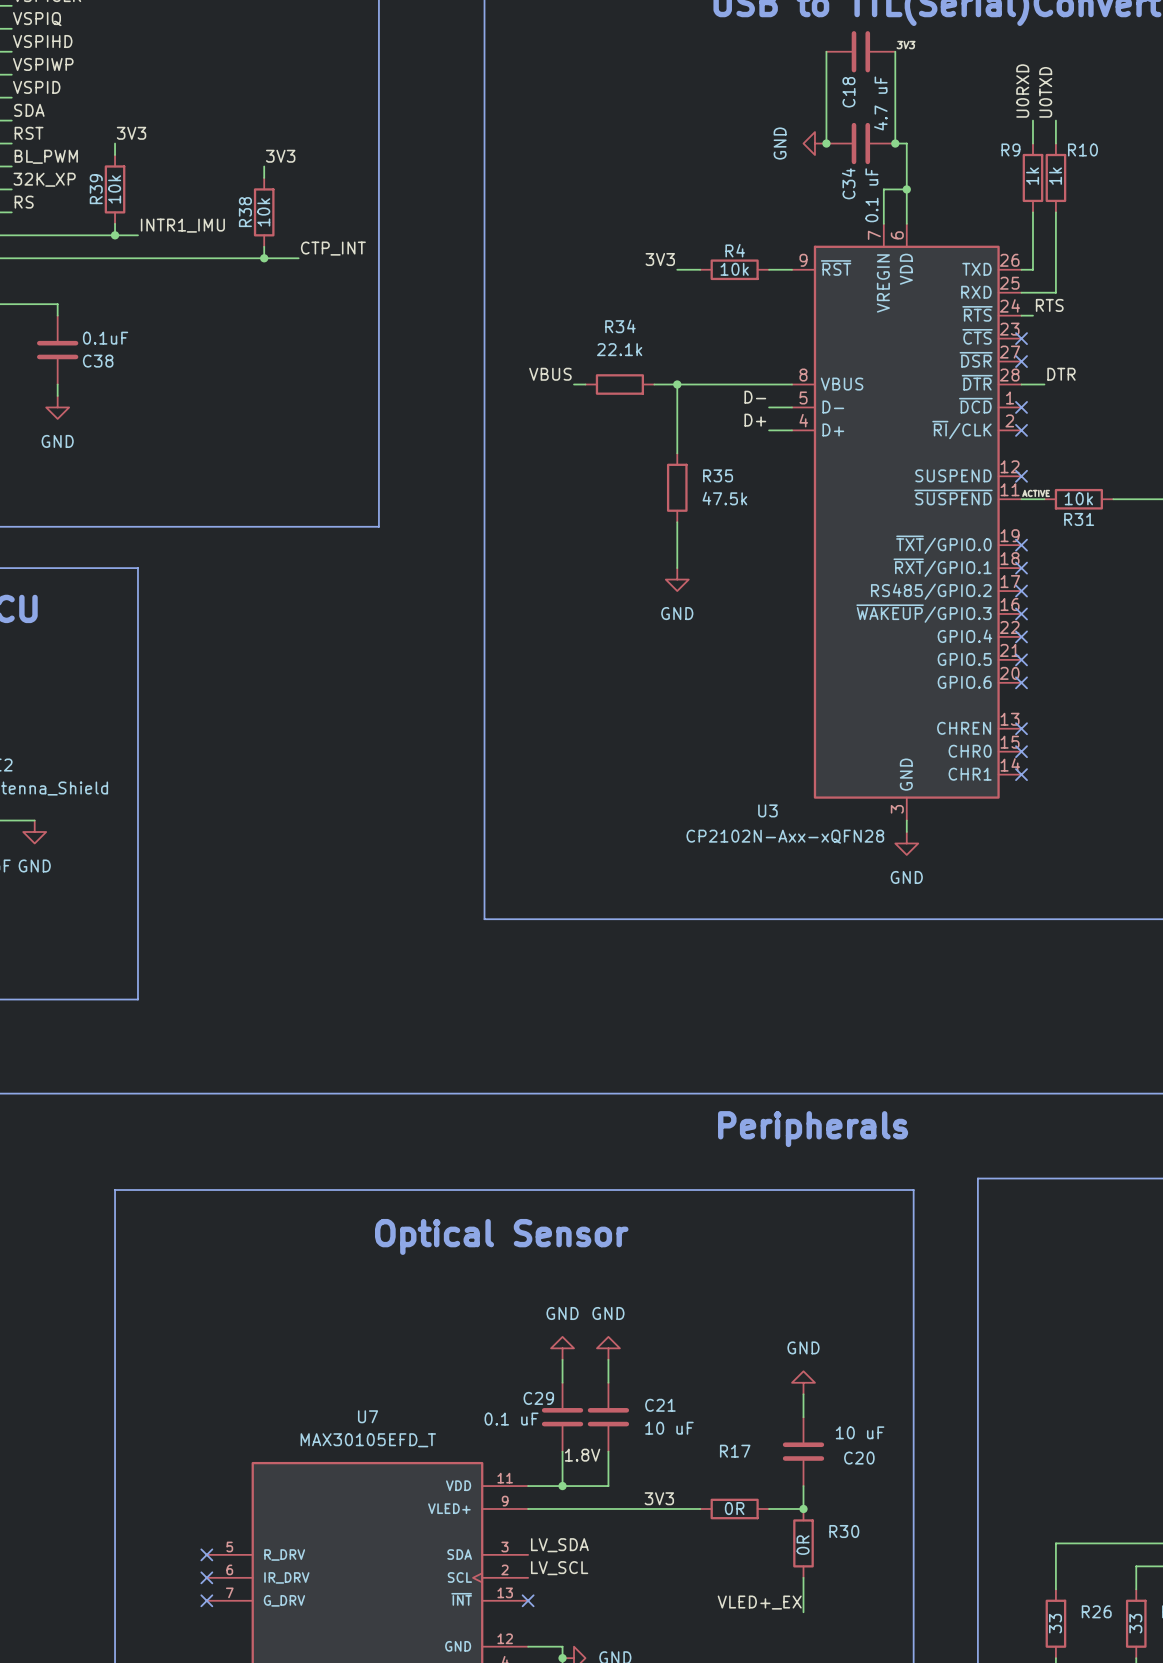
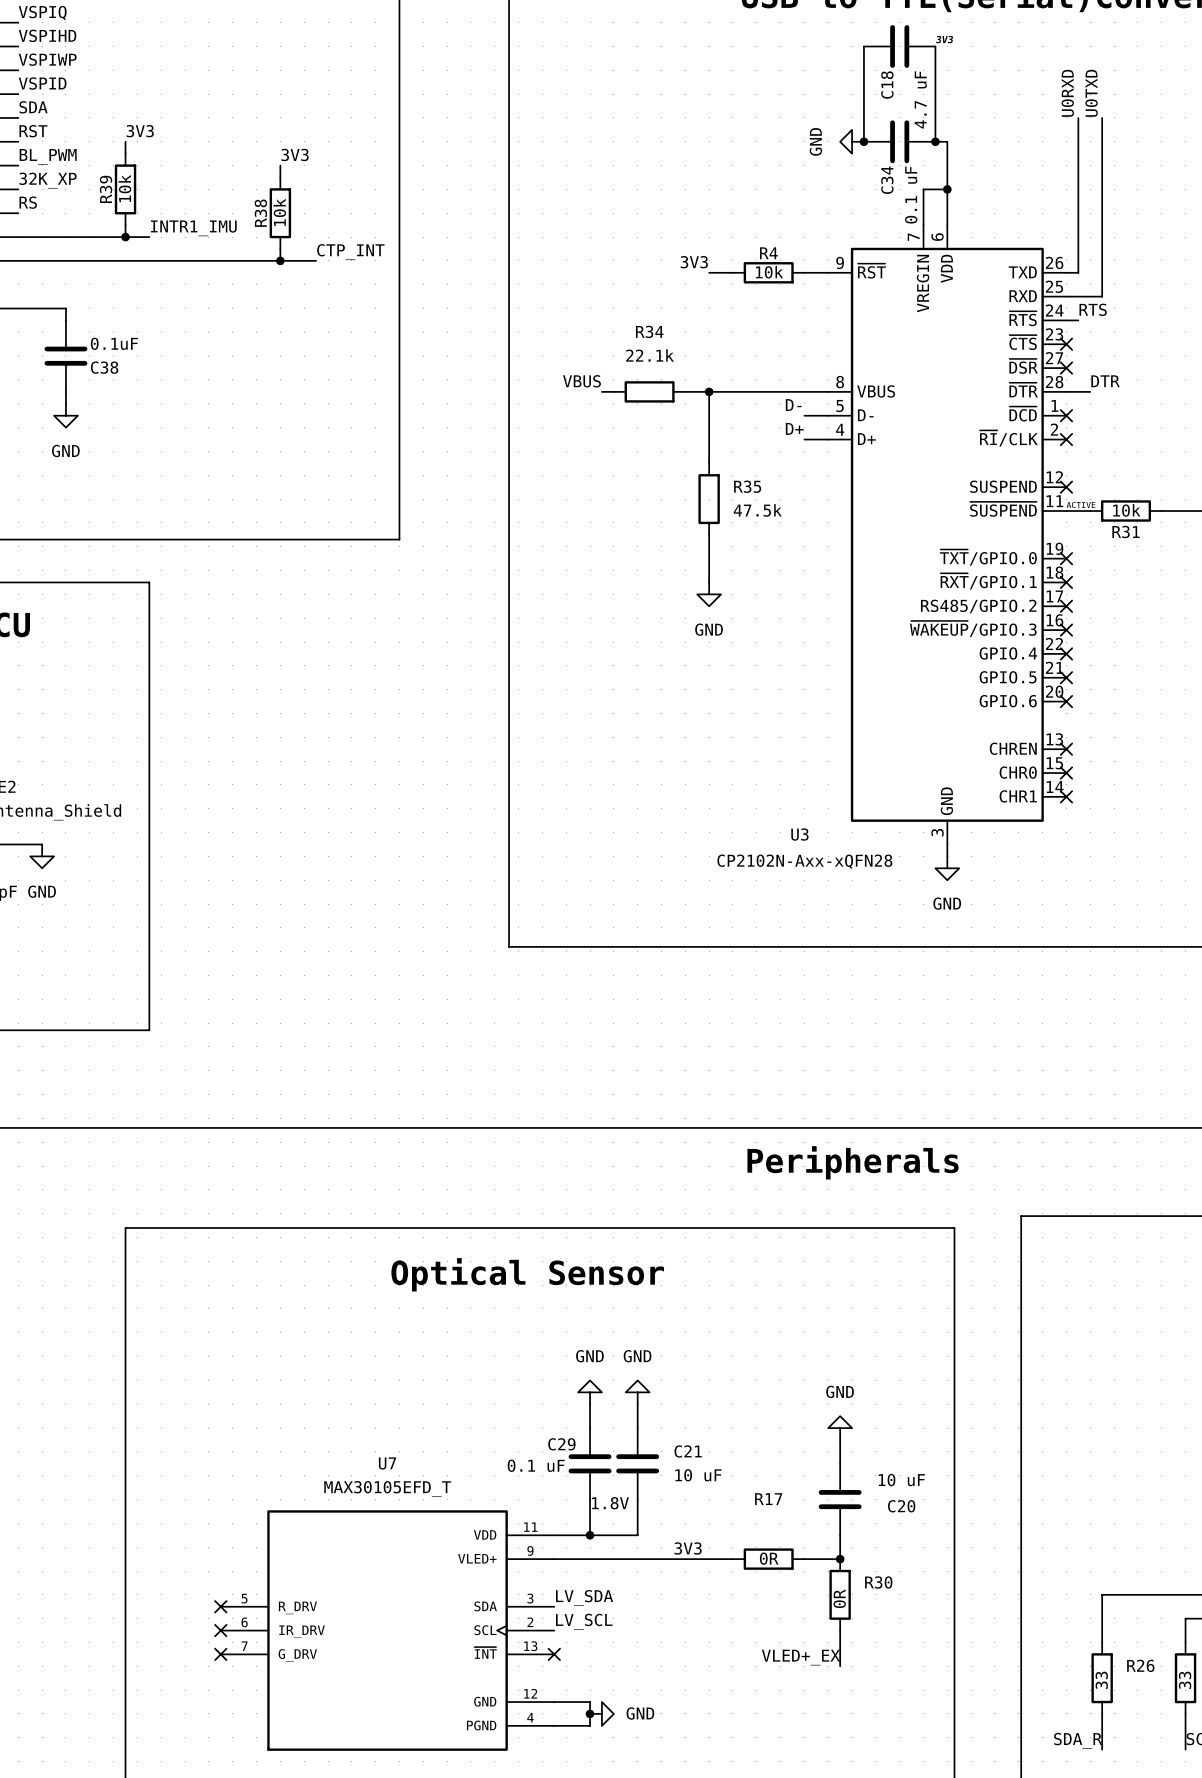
wire: none -> (1078, 141) (1078, 213)
wire: none -> (1102, 141) (1102, 213)
R9: 1k (1032, 177) -> none
R10: 1k (1055, 177) -> none

